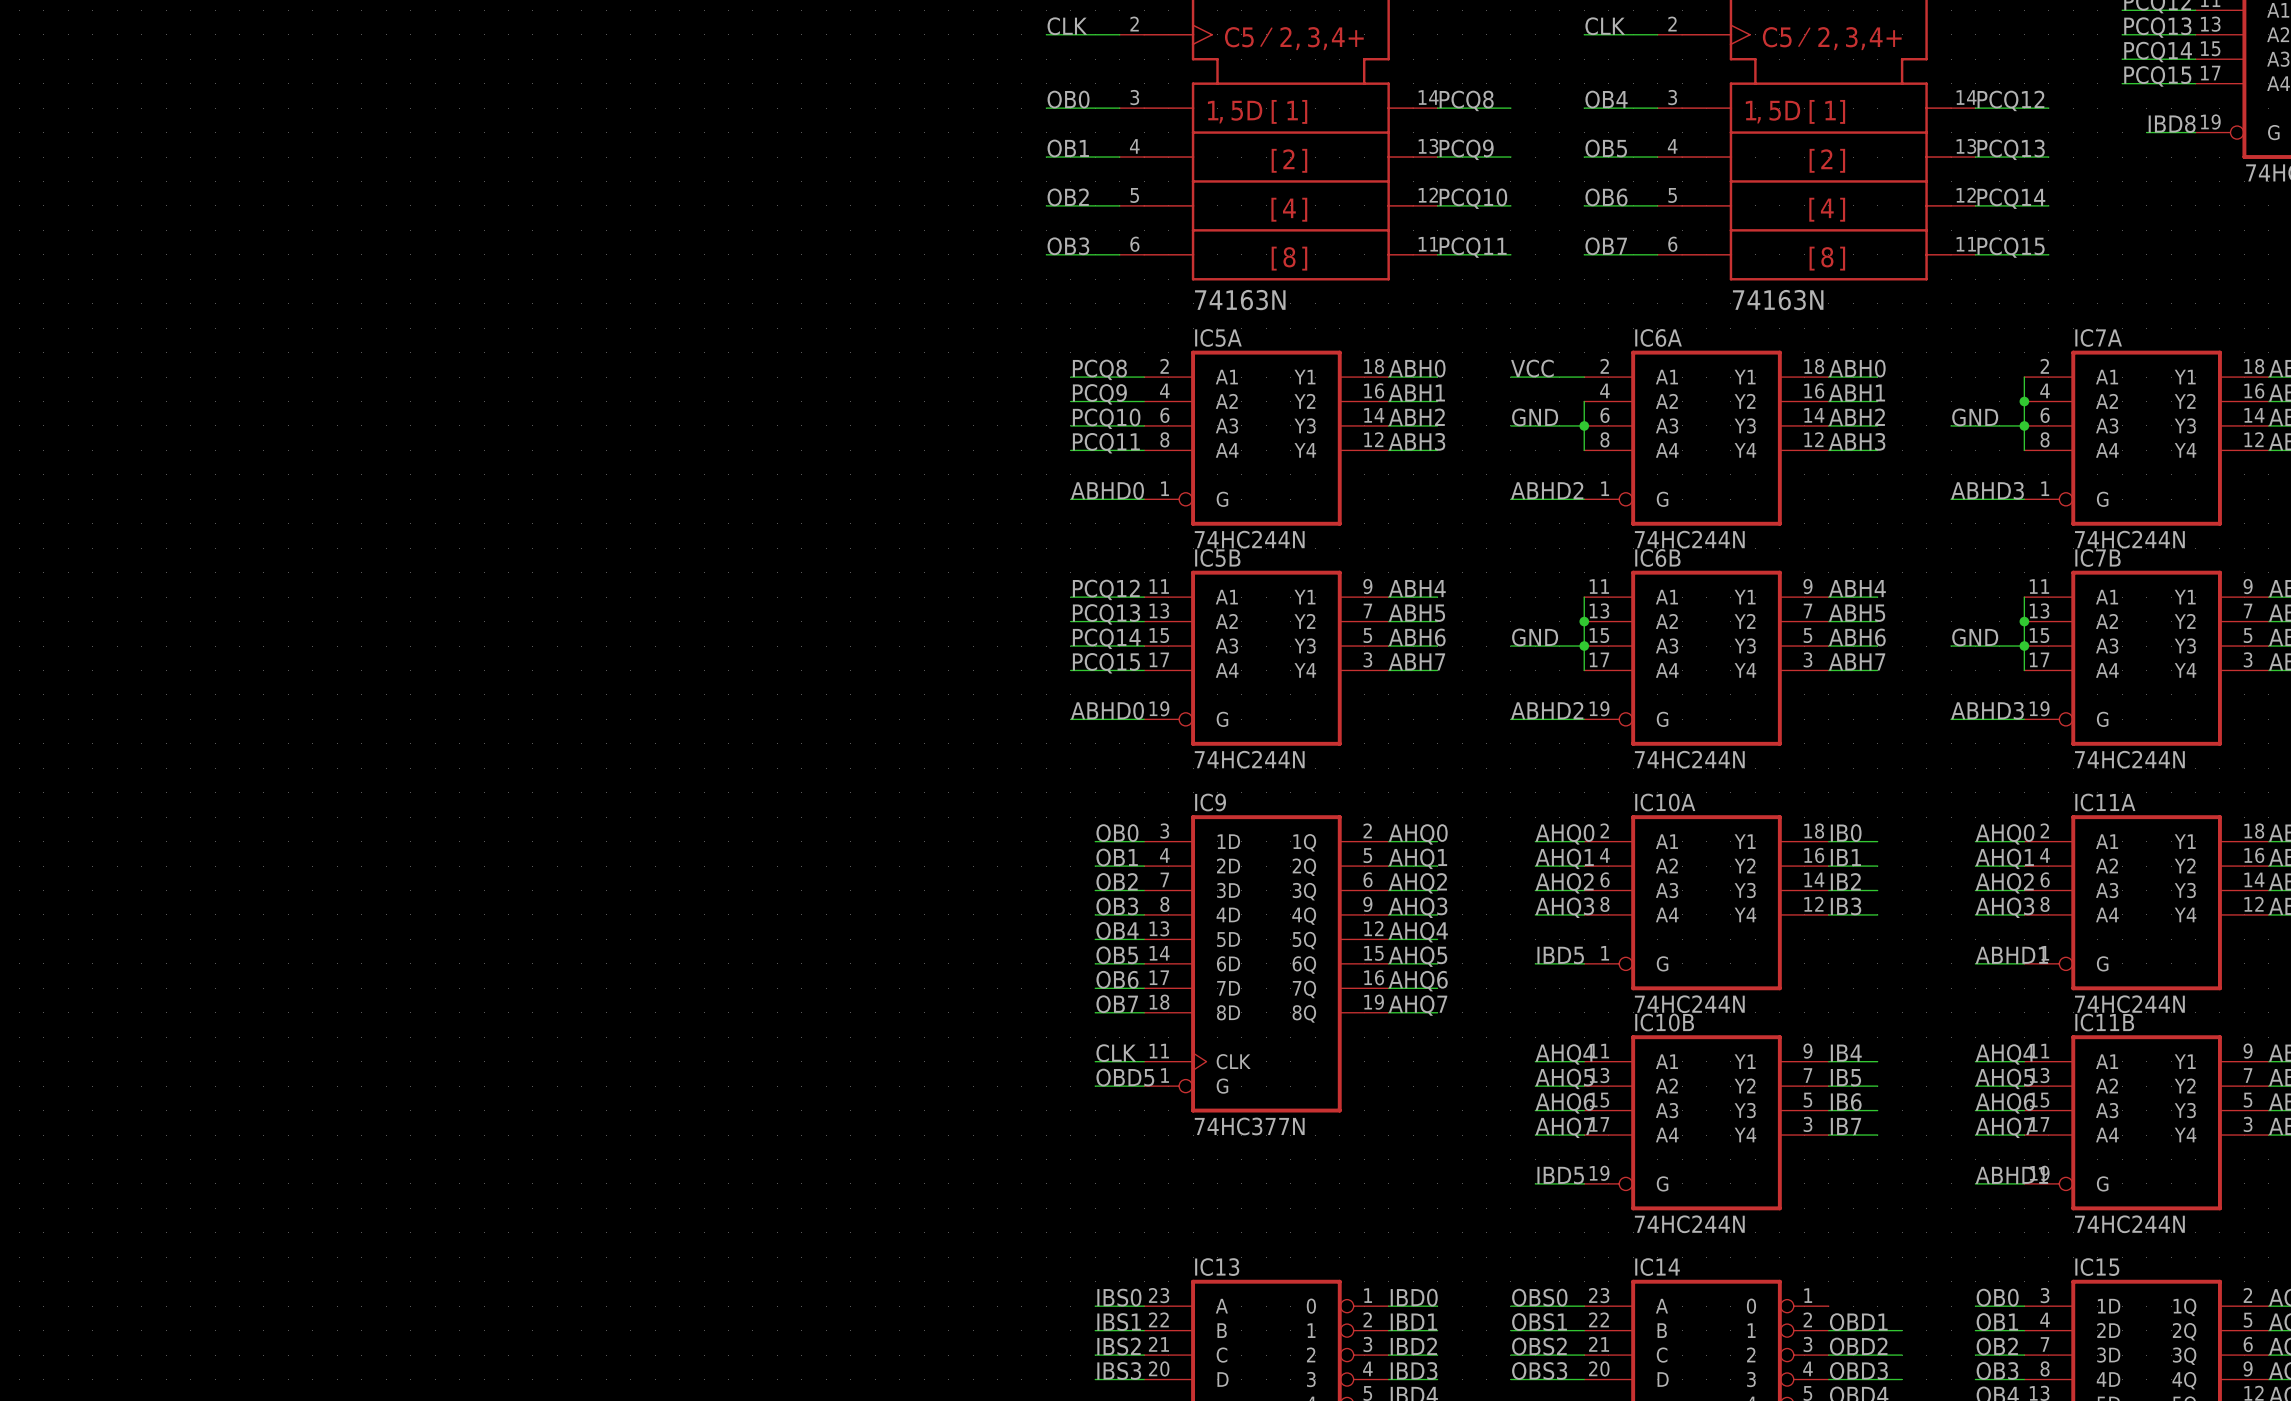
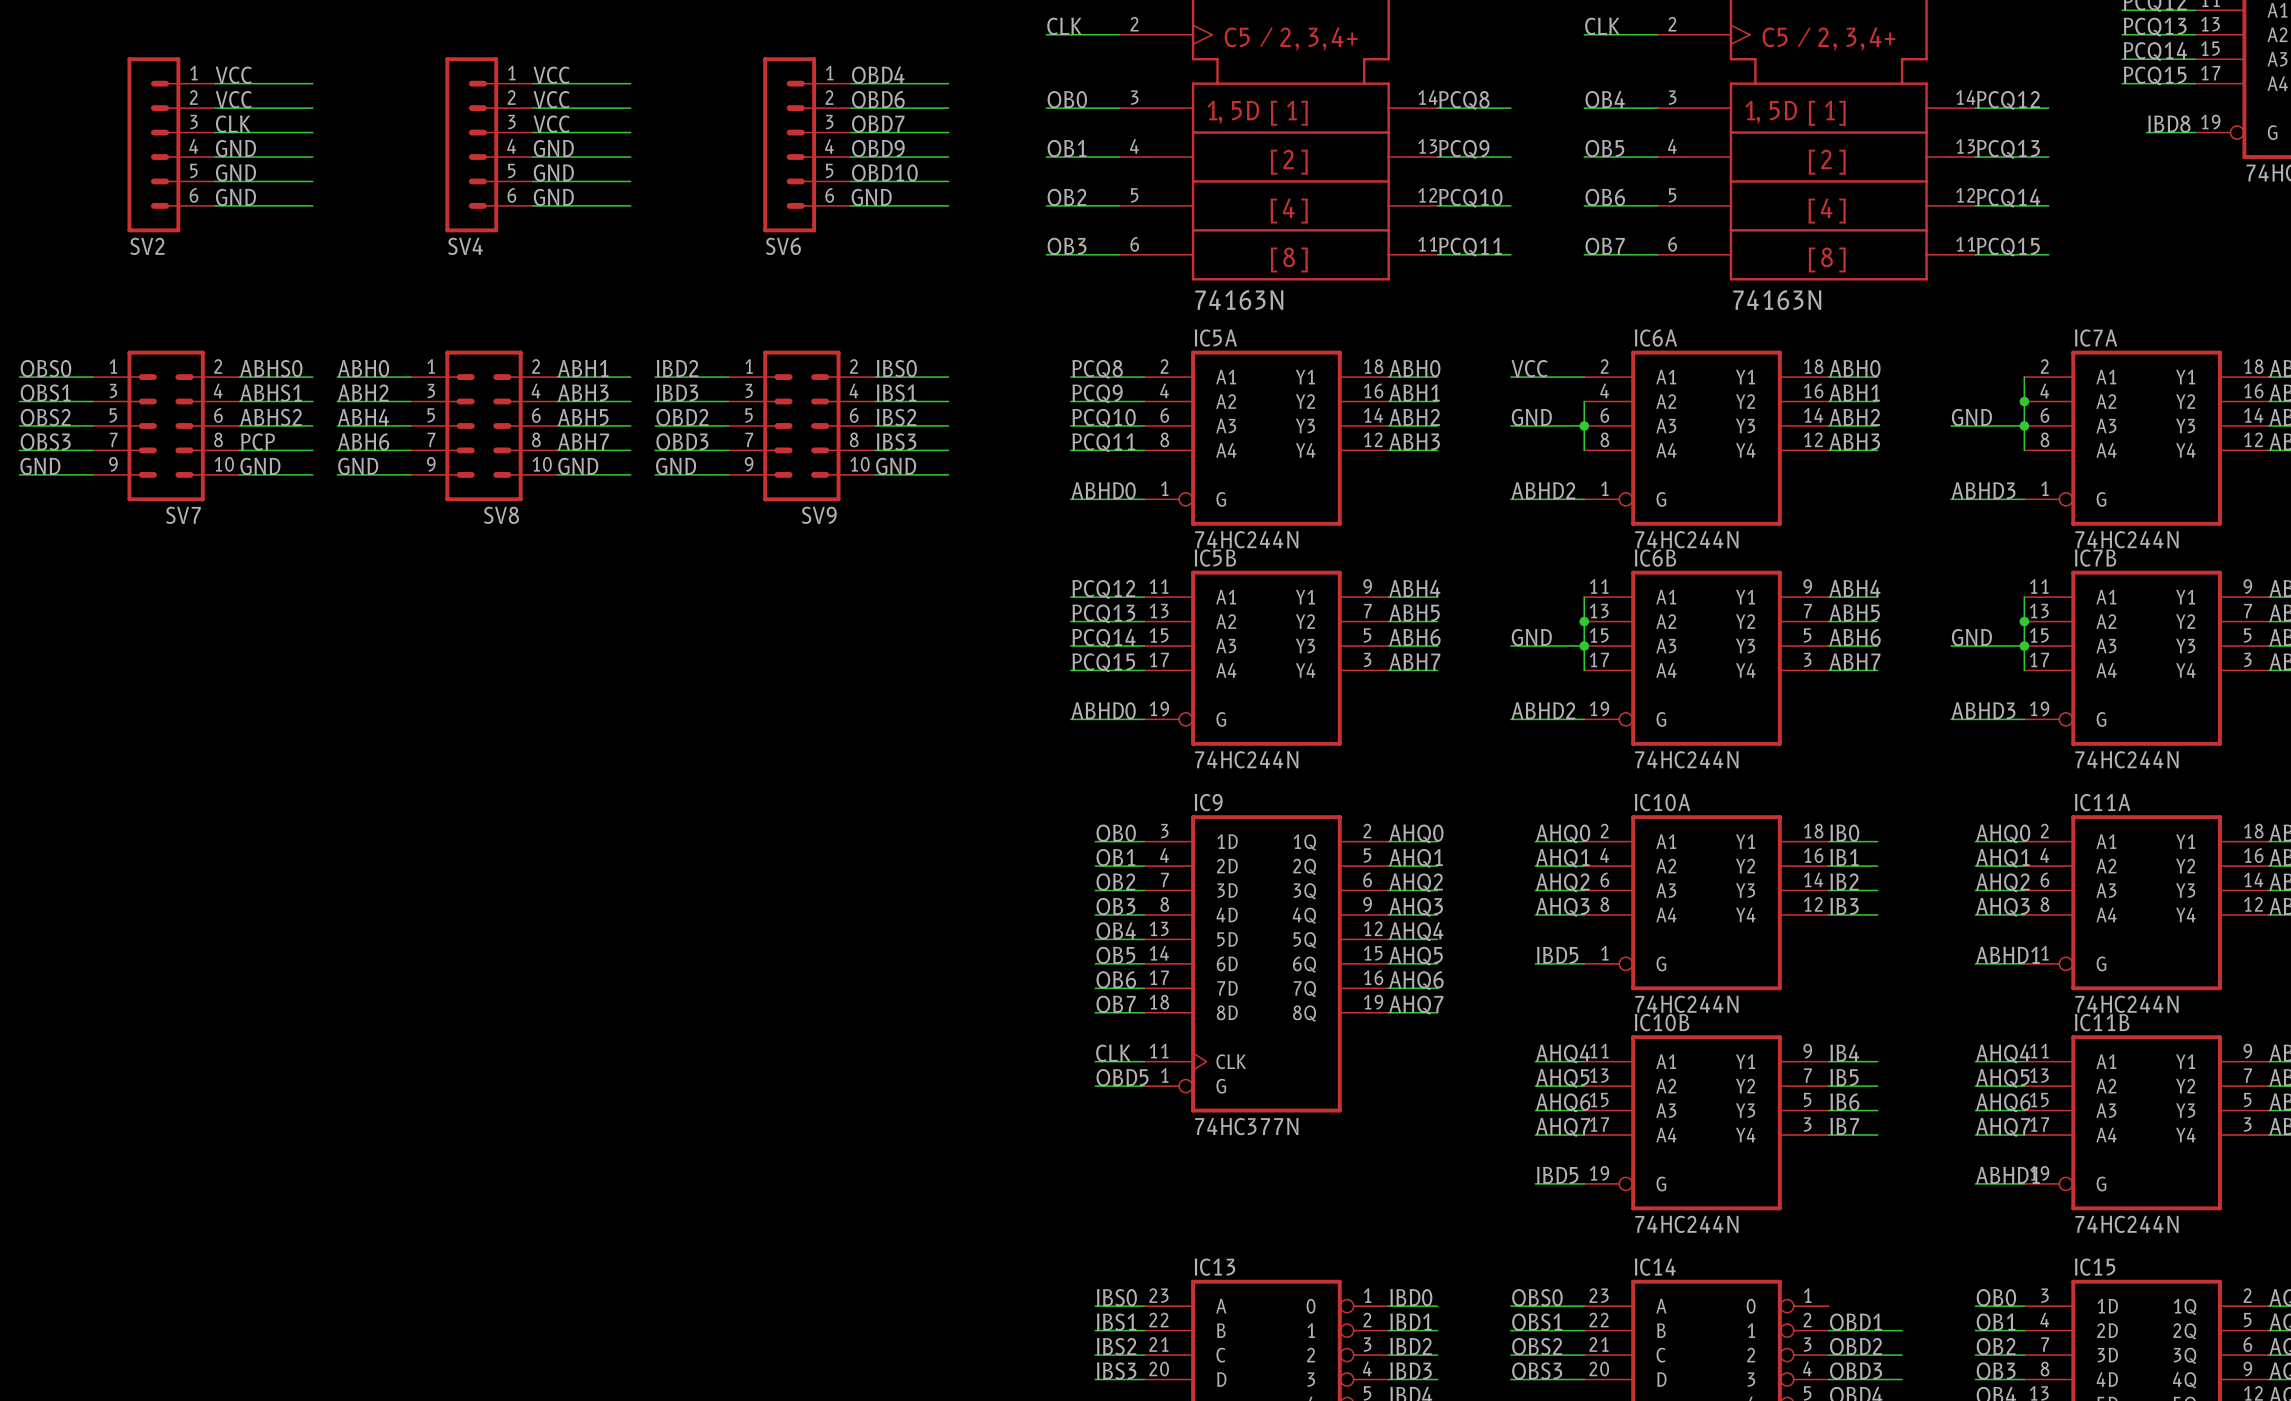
label: none -> VCC (233, 75)
label: none -> VCC (551, 75)
label: none -> OBD4 (878, 75)
wire: none -> (215, 83) (312, 83)
wire: none -> (532, 83) (630, 83)
wire: none -> (850, 83) (948, 83)
label: none -> VCC (233, 99)
label: none -> VCC (551, 99)
label: none -> OBD6 (878, 99)
wire: none -> (215, 108) (312, 108)
wire: none -> (532, 108) (630, 108)
wire: none -> (850, 108) (948, 108)
label: none -> CLK (233, 124)
label: none -> VCC (551, 124)
label: none -> OBD7 (878, 124)
wire: none -> (215, 132) (312, 132)
wire: none -> (532, 132) (630, 132)
wire: none -> (850, 132) (948, 132)
SV2: none -> (171, 144)
SV4: none -> (489, 144)
SV6: none -> (806, 144)
label: none -> GND (235, 148)
label: none -> GND (553, 148)
label: none -> OBD9 (878, 148)
wire: none -> (215, 157) (312, 157)
wire: none -> (532, 157) (630, 157)
wire: none -> (850, 157) (948, 157)
label: none -> GND (235, 173)
label: none -> GND (553, 173)
label: none -> OBD10 (884, 173)
wire: none -> (215, 181) (312, 181)
wire: none -> (532, 181) (630, 181)
wire: none -> (850, 181) (948, 181)
label: none -> GND (235, 197)
label: none -> GND (553, 197)
label: none -> GND (871, 197)
wire: none -> (215, 205) (312, 205)
wire: none -> (532, 205) (630, 205)
wire: none -> (850, 205) (948, 205)
label: none -> OBS0 (45, 368)
label: none -> ABHS0 (271, 368)
label: none -> ABH0 (363, 368)
label: none -> ABH1 (583, 368)
label: none -> IBD2 (677, 368)
label: none -> IBS0 (896, 368)
wire: none -> (19, 377) (92, 377)
wire: none -> (239, 377) (312, 377)
wire: none -> (337, 377) (410, 377)
wire: none -> (557, 377) (630, 377)
wire: none -> (655, 377) (728, 377)
wire: none -> (875, 377) (948, 377)
label: none -> OBS1 (45, 393)
label: none -> ABHS1 (270, 393)
label: none -> ABH2 (363, 392)
label: none -> ABH3 (583, 392)
label: none -> IBD3 (677, 392)
label: none -> IBS1 (896, 393)
wire: none -> (19, 401) (92, 401)
wire: none -> (239, 401) (312, 401)
wire: none -> (337, 401) (410, 401)
wire: none -> (557, 401) (630, 401)
wire: none -> (655, 401) (728, 401)
wire: none -> (875, 401) (948, 401)
label: none -> OBS2 (45, 417)
label: none -> ABHS2 (271, 417)
label: none -> ABH4 (363, 417)
label: none -> ABH5 (583, 417)
label: none -> OBD2 (682, 417)
label: none -> IBS2 (896, 417)
wire: none -> (19, 425) (92, 425)
SV7: none -> (166, 425)
wire: none -> (239, 425) (312, 425)
wire: none -> (337, 425) (410, 425)
SV8: none -> (484, 425)
wire: none -> (557, 425) (630, 425)
wire: none -> (655, 425) (728, 425)
SV9: none -> (801, 425)
wire: none -> (875, 425) (948, 425)
label: none -> OBS3 (45, 441)
label: none -> PCP (257, 441)
label: none -> ABH6 (363, 441)
label: none -> ABH7 (583, 441)
label: none -> OBD3 (682, 441)
label: none -> IBS3 (896, 441)
wire: none -> (19, 450) (92, 450)
wire: none -> (239, 450) (312, 450)
wire: none -> (337, 450) (410, 450)
wire: none -> (557, 450) (630, 450)
wire: none -> (655, 450) (728, 450)
wire: none -> (875, 450) (948, 450)
label: none -> GND (40, 466)
label: none -> GND (260, 466)
label: none -> GND (358, 466)
label: none -> GND (578, 466)
label: none -> GND (676, 466)
label: none -> GND (896, 466)
wire: none -> (19, 474) (92, 474)
wire: none -> (239, 474) (312, 474)
wire: none -> (337, 474) (410, 474)
wire: none -> (557, 474) (630, 474)
wire: none -> (655, 474) (728, 474)
wire: none -> (875, 474) (948, 474)

